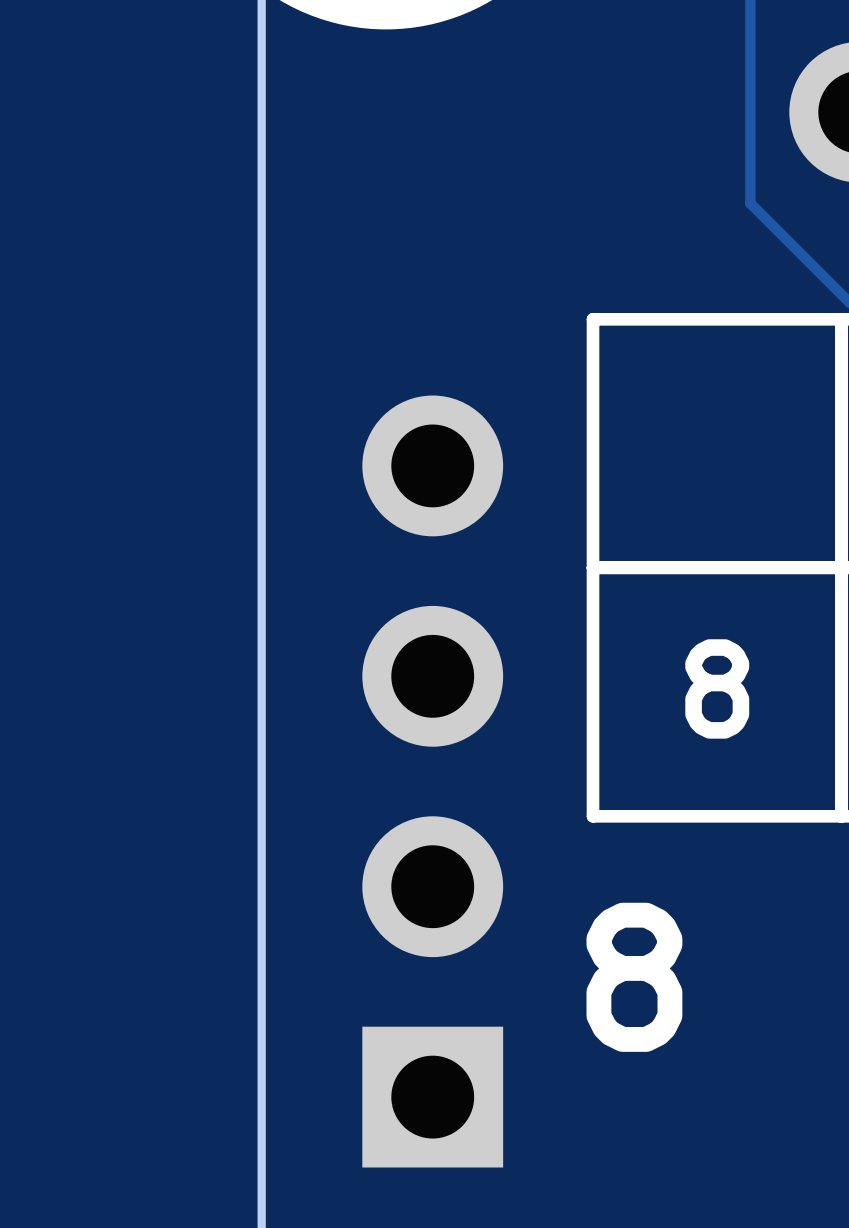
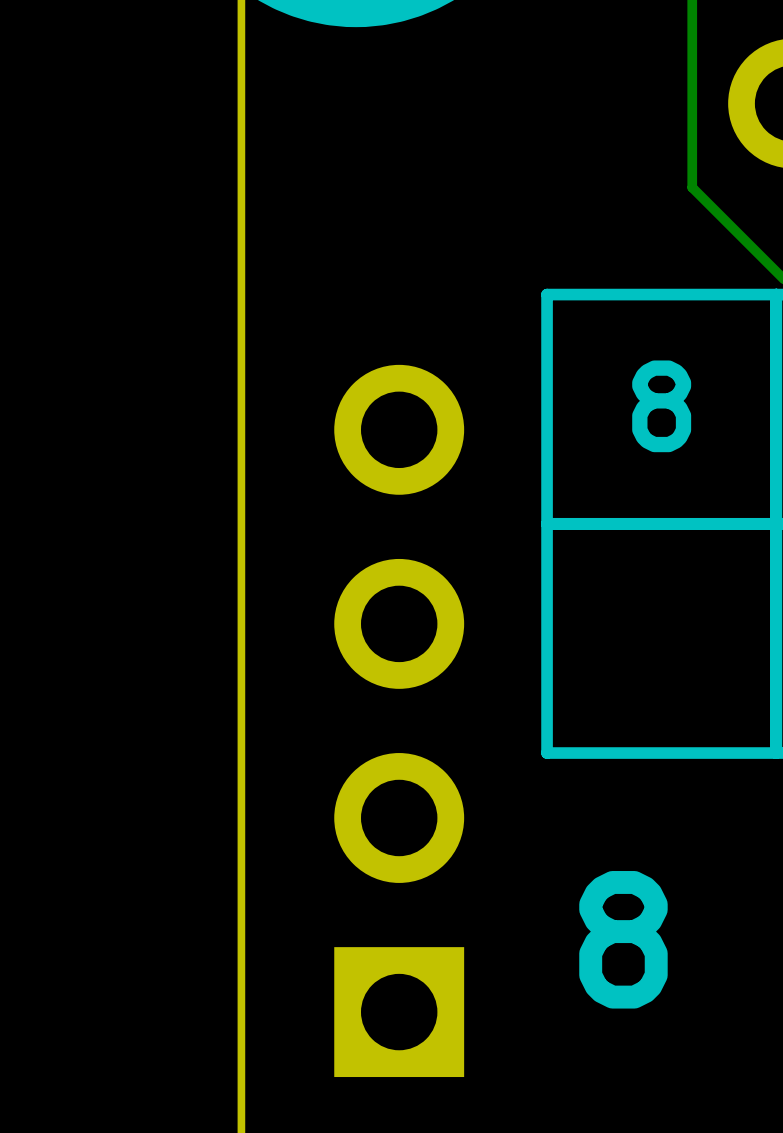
text position: 8 (717, 688) -> 8 (661, 406)
text position: 8 (634, 977) -> 8 (623, 939)

